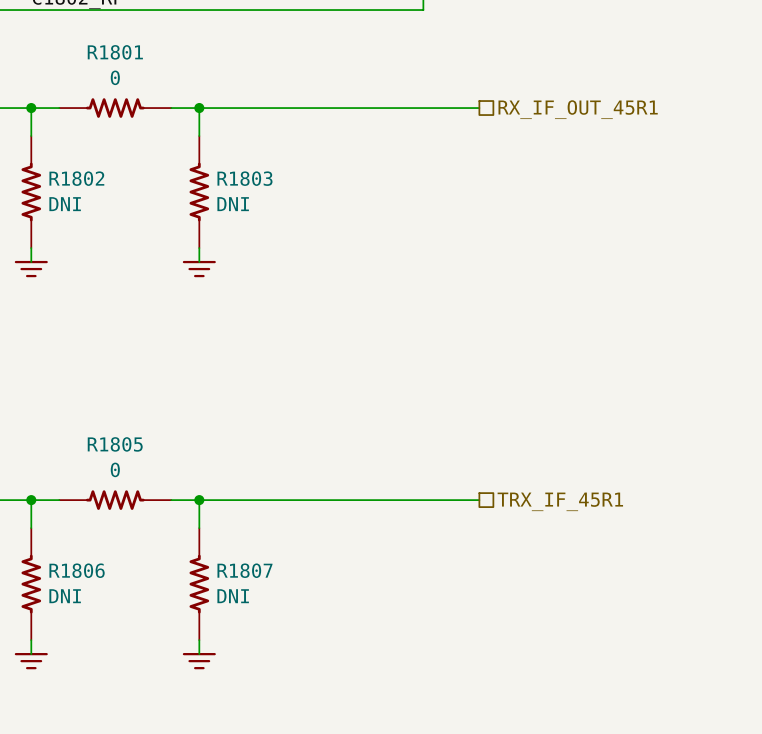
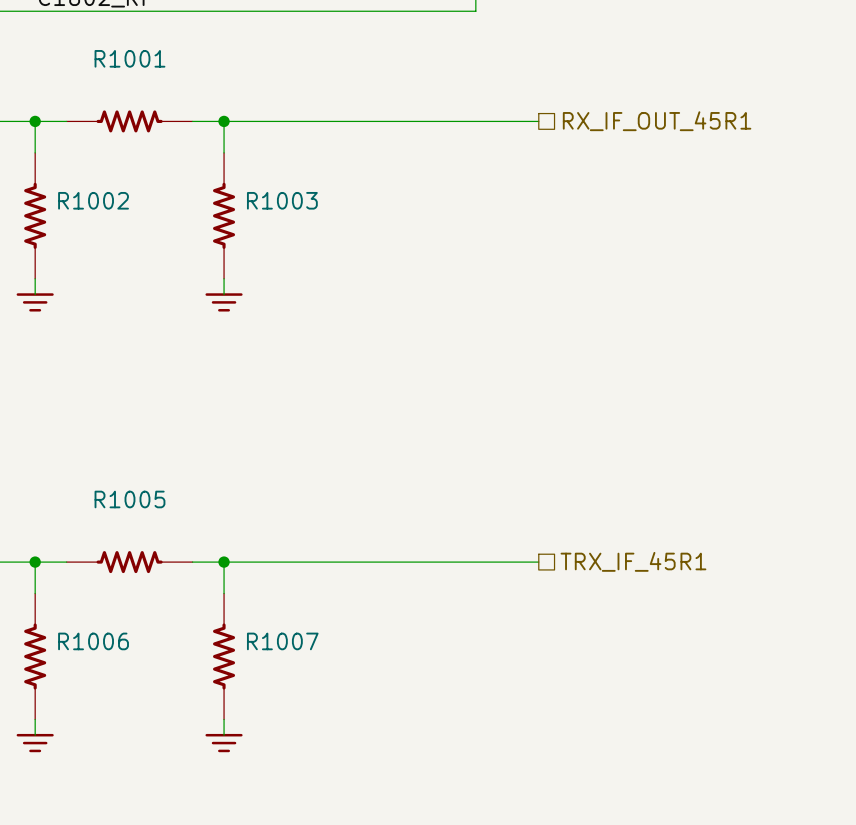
R1801 name: R1801 (115, 52) -> R1001 (129, 58)
R1801 value: 0 (115, 77) -> none
R1802 name: R1802 (76, 178) -> R1002 (93, 200)
R1803 name: R1803 (244, 178) -> R1003 (282, 200)
R1802 value: DNI (65, 204) -> none
R1803 value: DNI (233, 204) -> none
R1805 name: R1805 (115, 444) -> R1005 (129, 499)
R1805 value: 0 (115, 469) -> none
R1806 name: R1806 (77, 570) -> R1006 (93, 641)
R1807 name: R1807 (244, 570) -> R1007 (282, 641)
R1806 value: DNI (65, 596) -> none
R1807 value: DNI (233, 596) -> none

